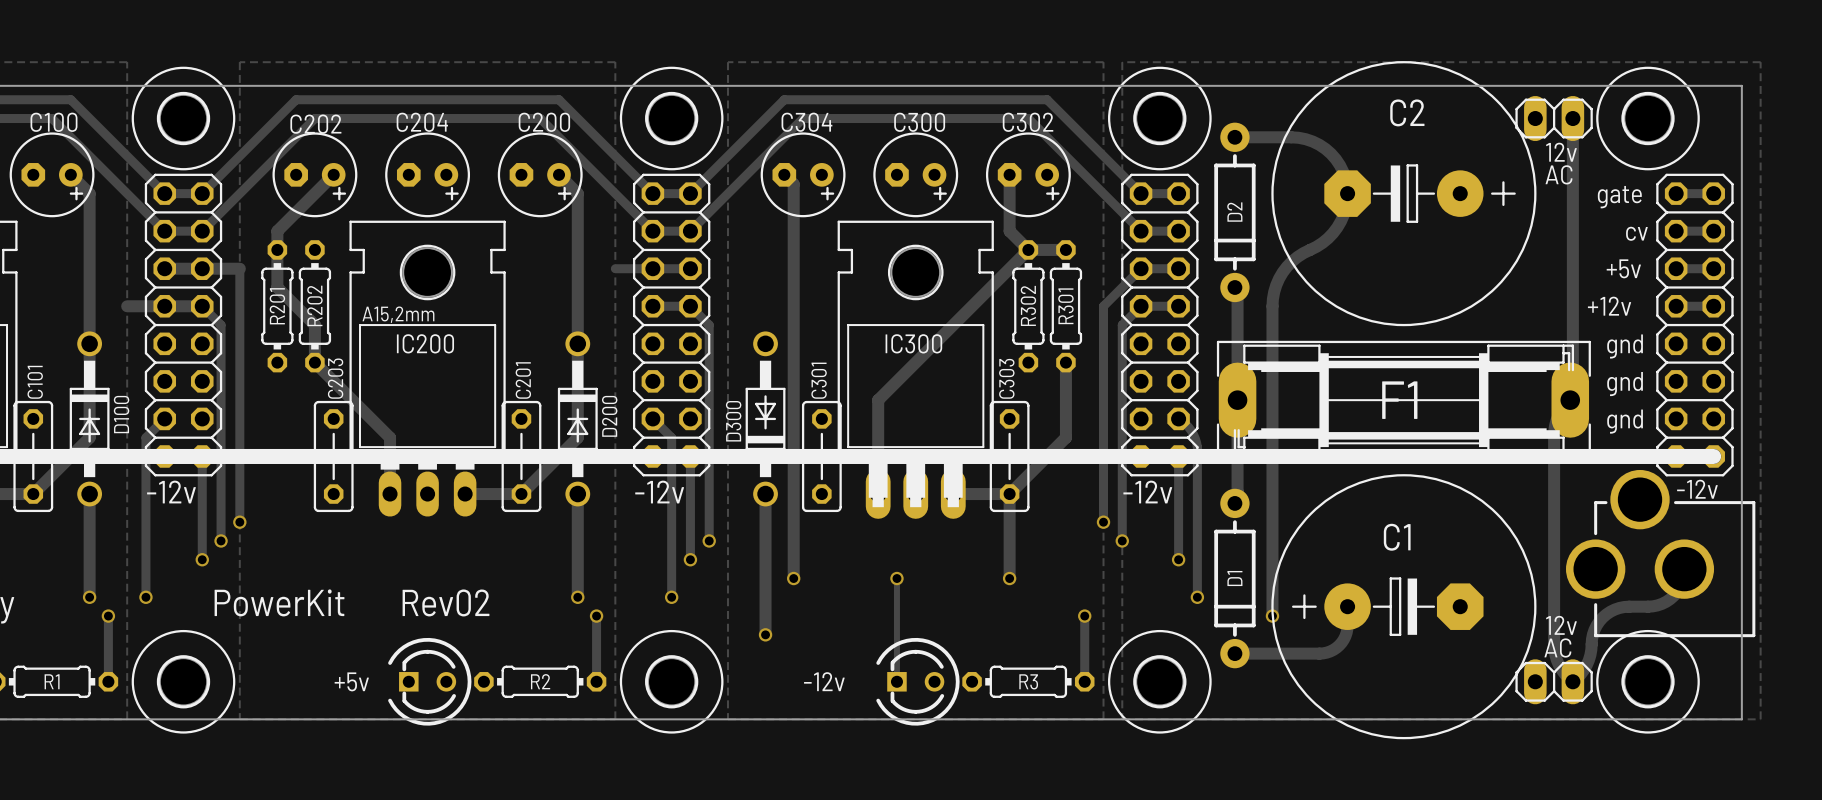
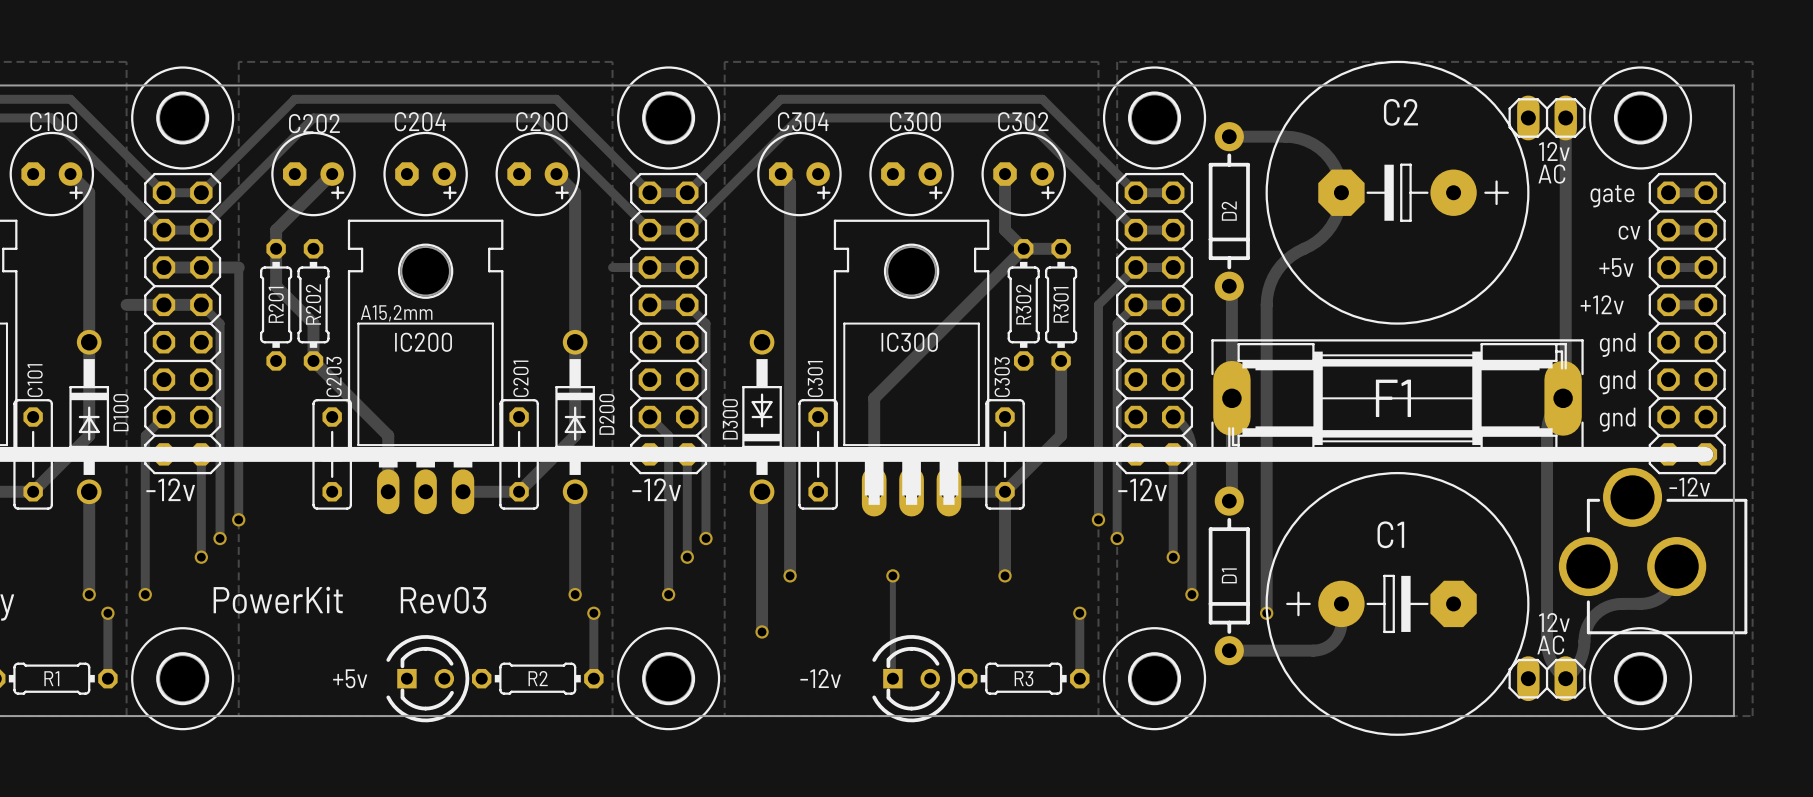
text: Rev02 (446, 602) -> Rev03 (443, 600)

